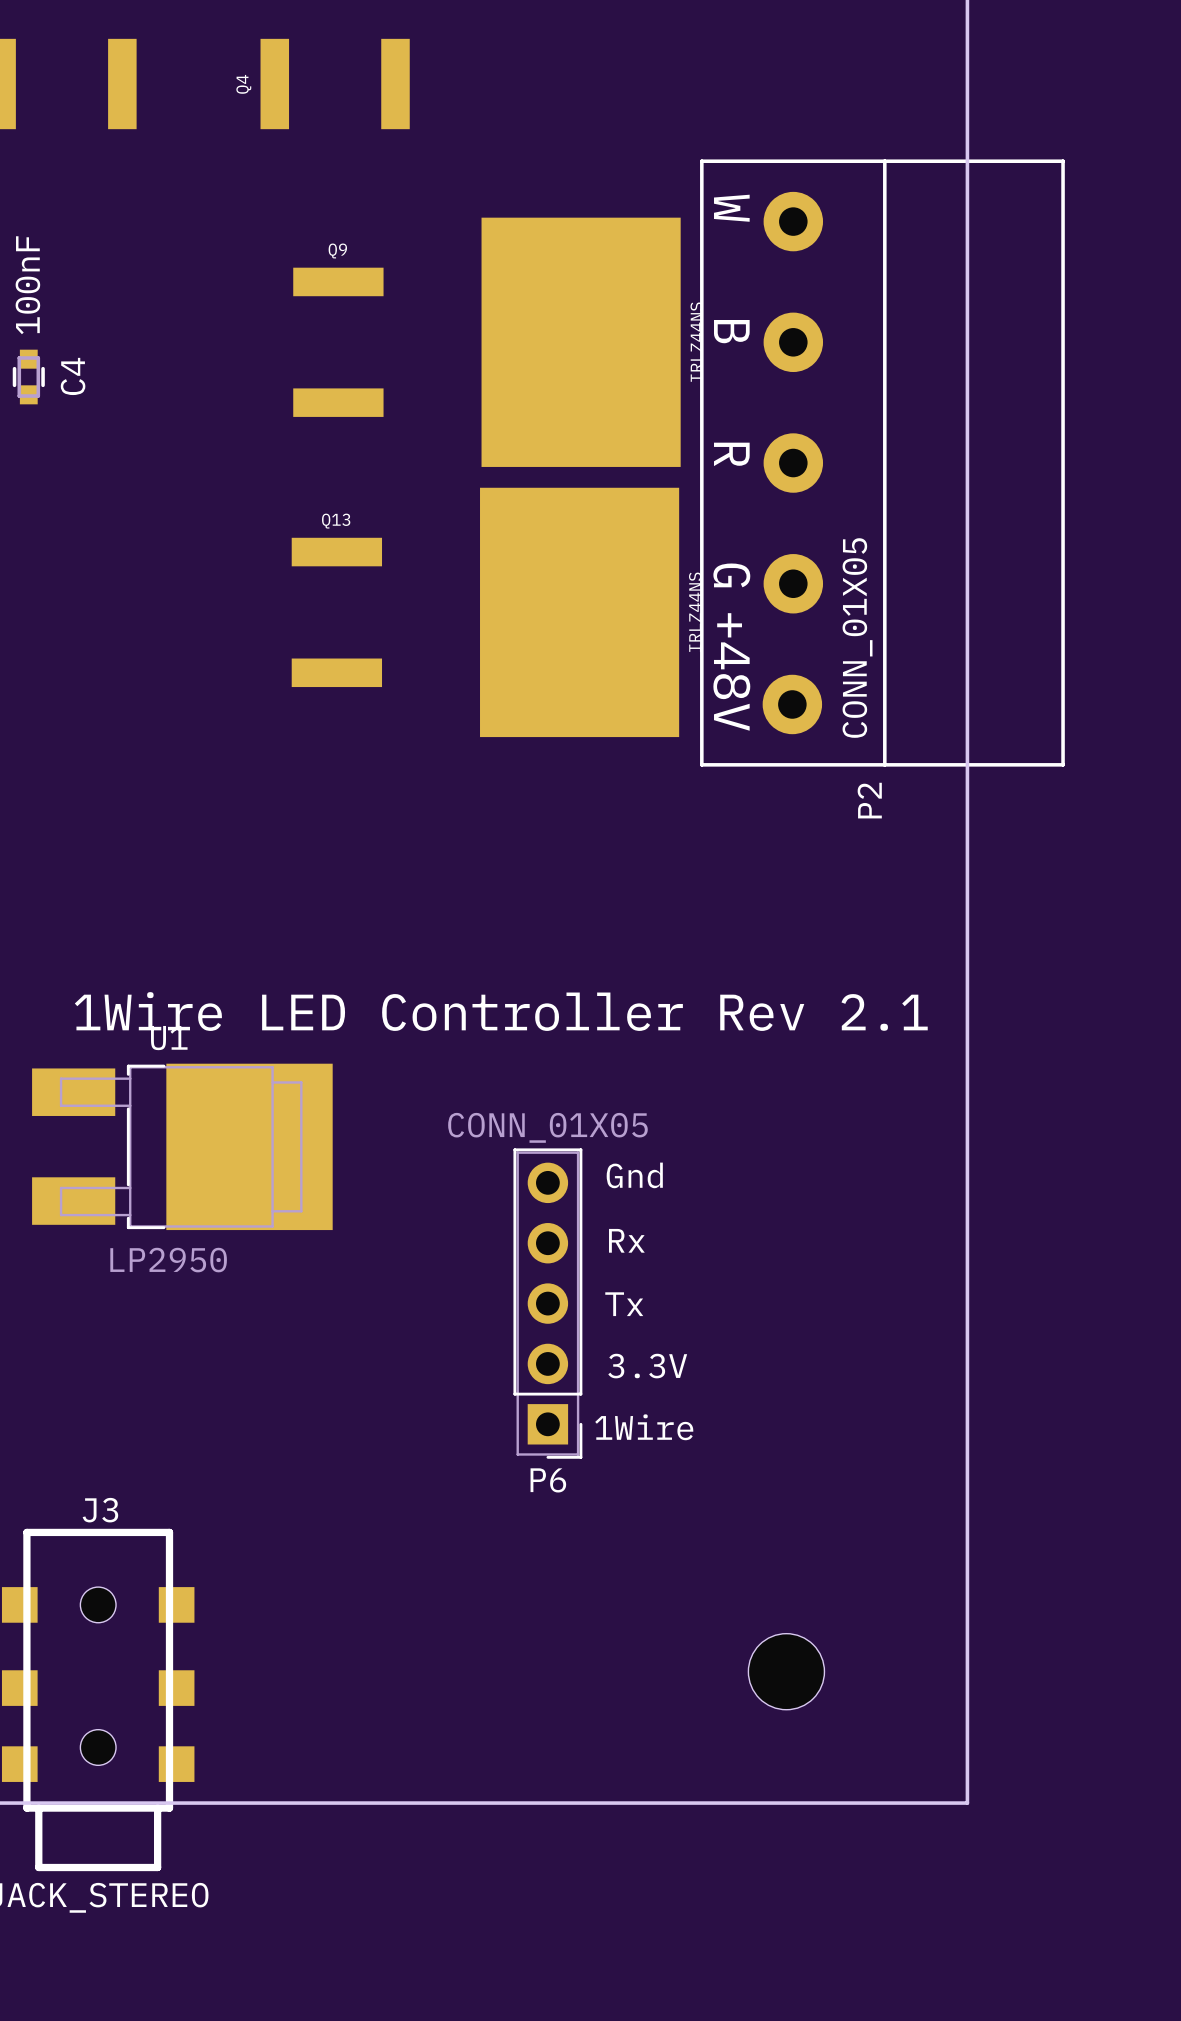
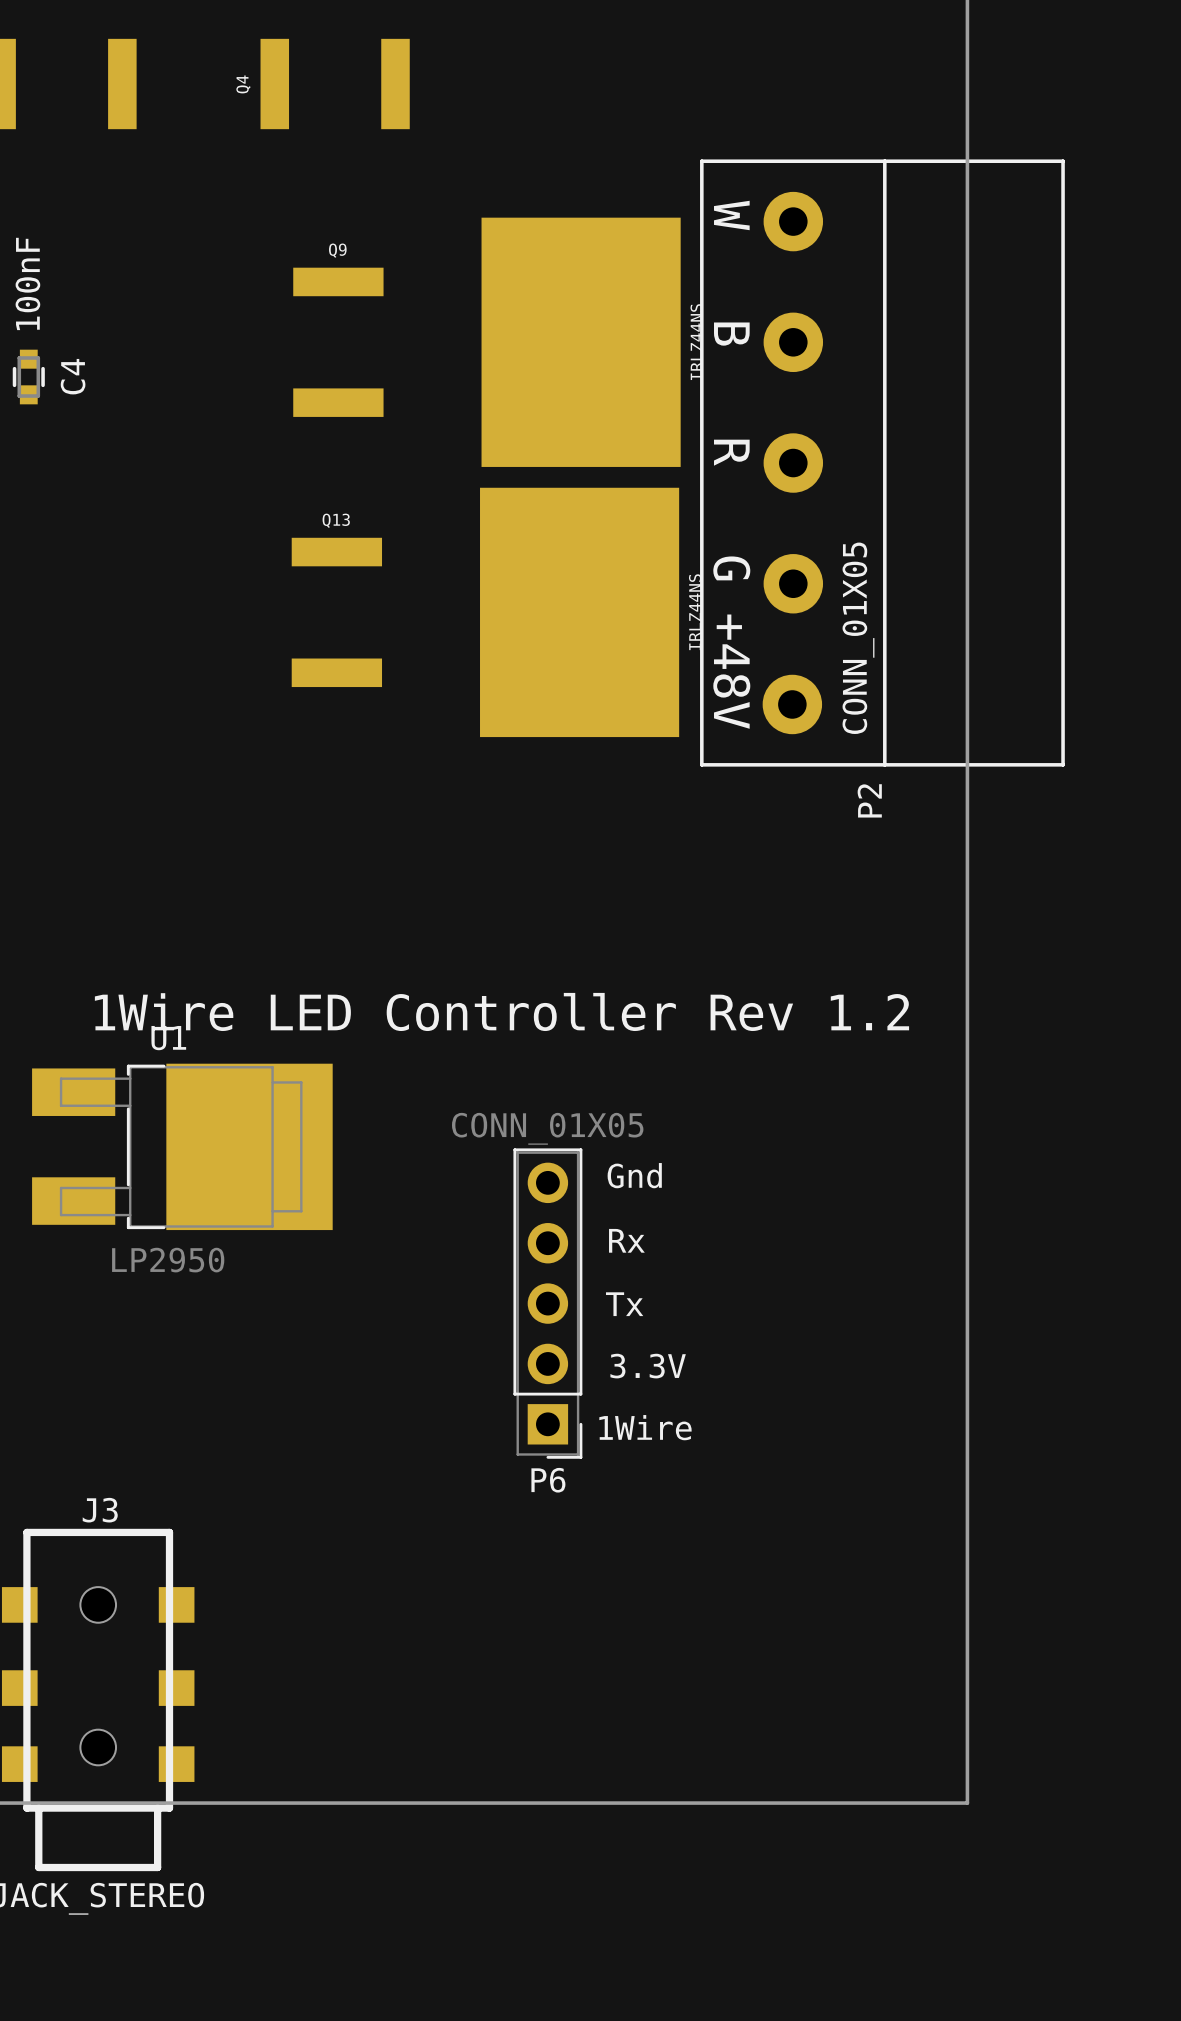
text: 1Wire LED Controller Rev 2.1 (501, 1011) -> 1Wire LED Controller Rev 1.2 (501, 1011)
part: (786, 1671) -> none

